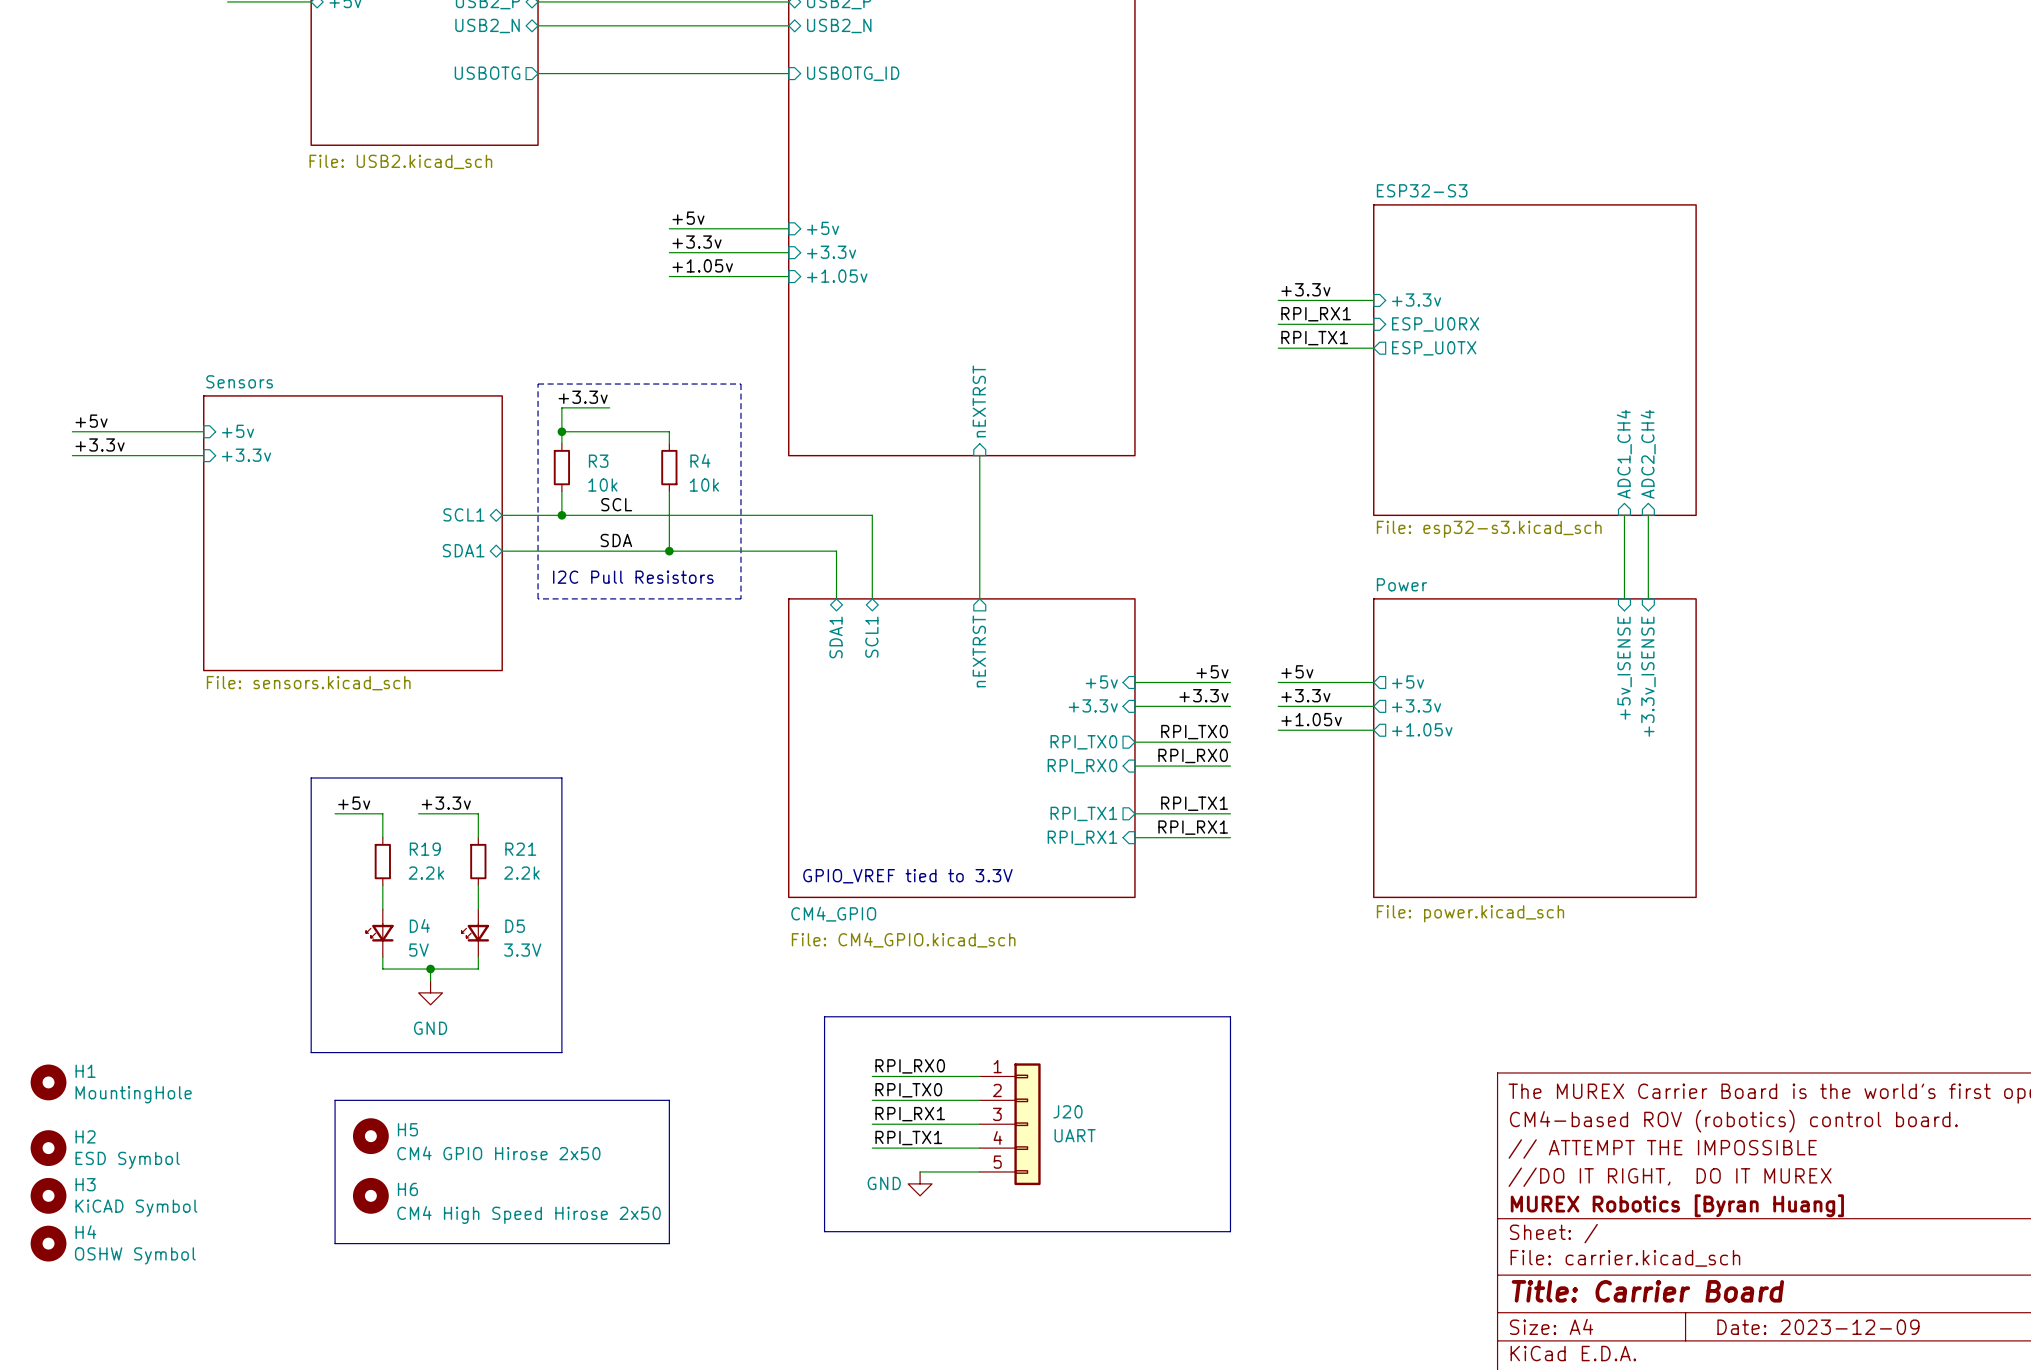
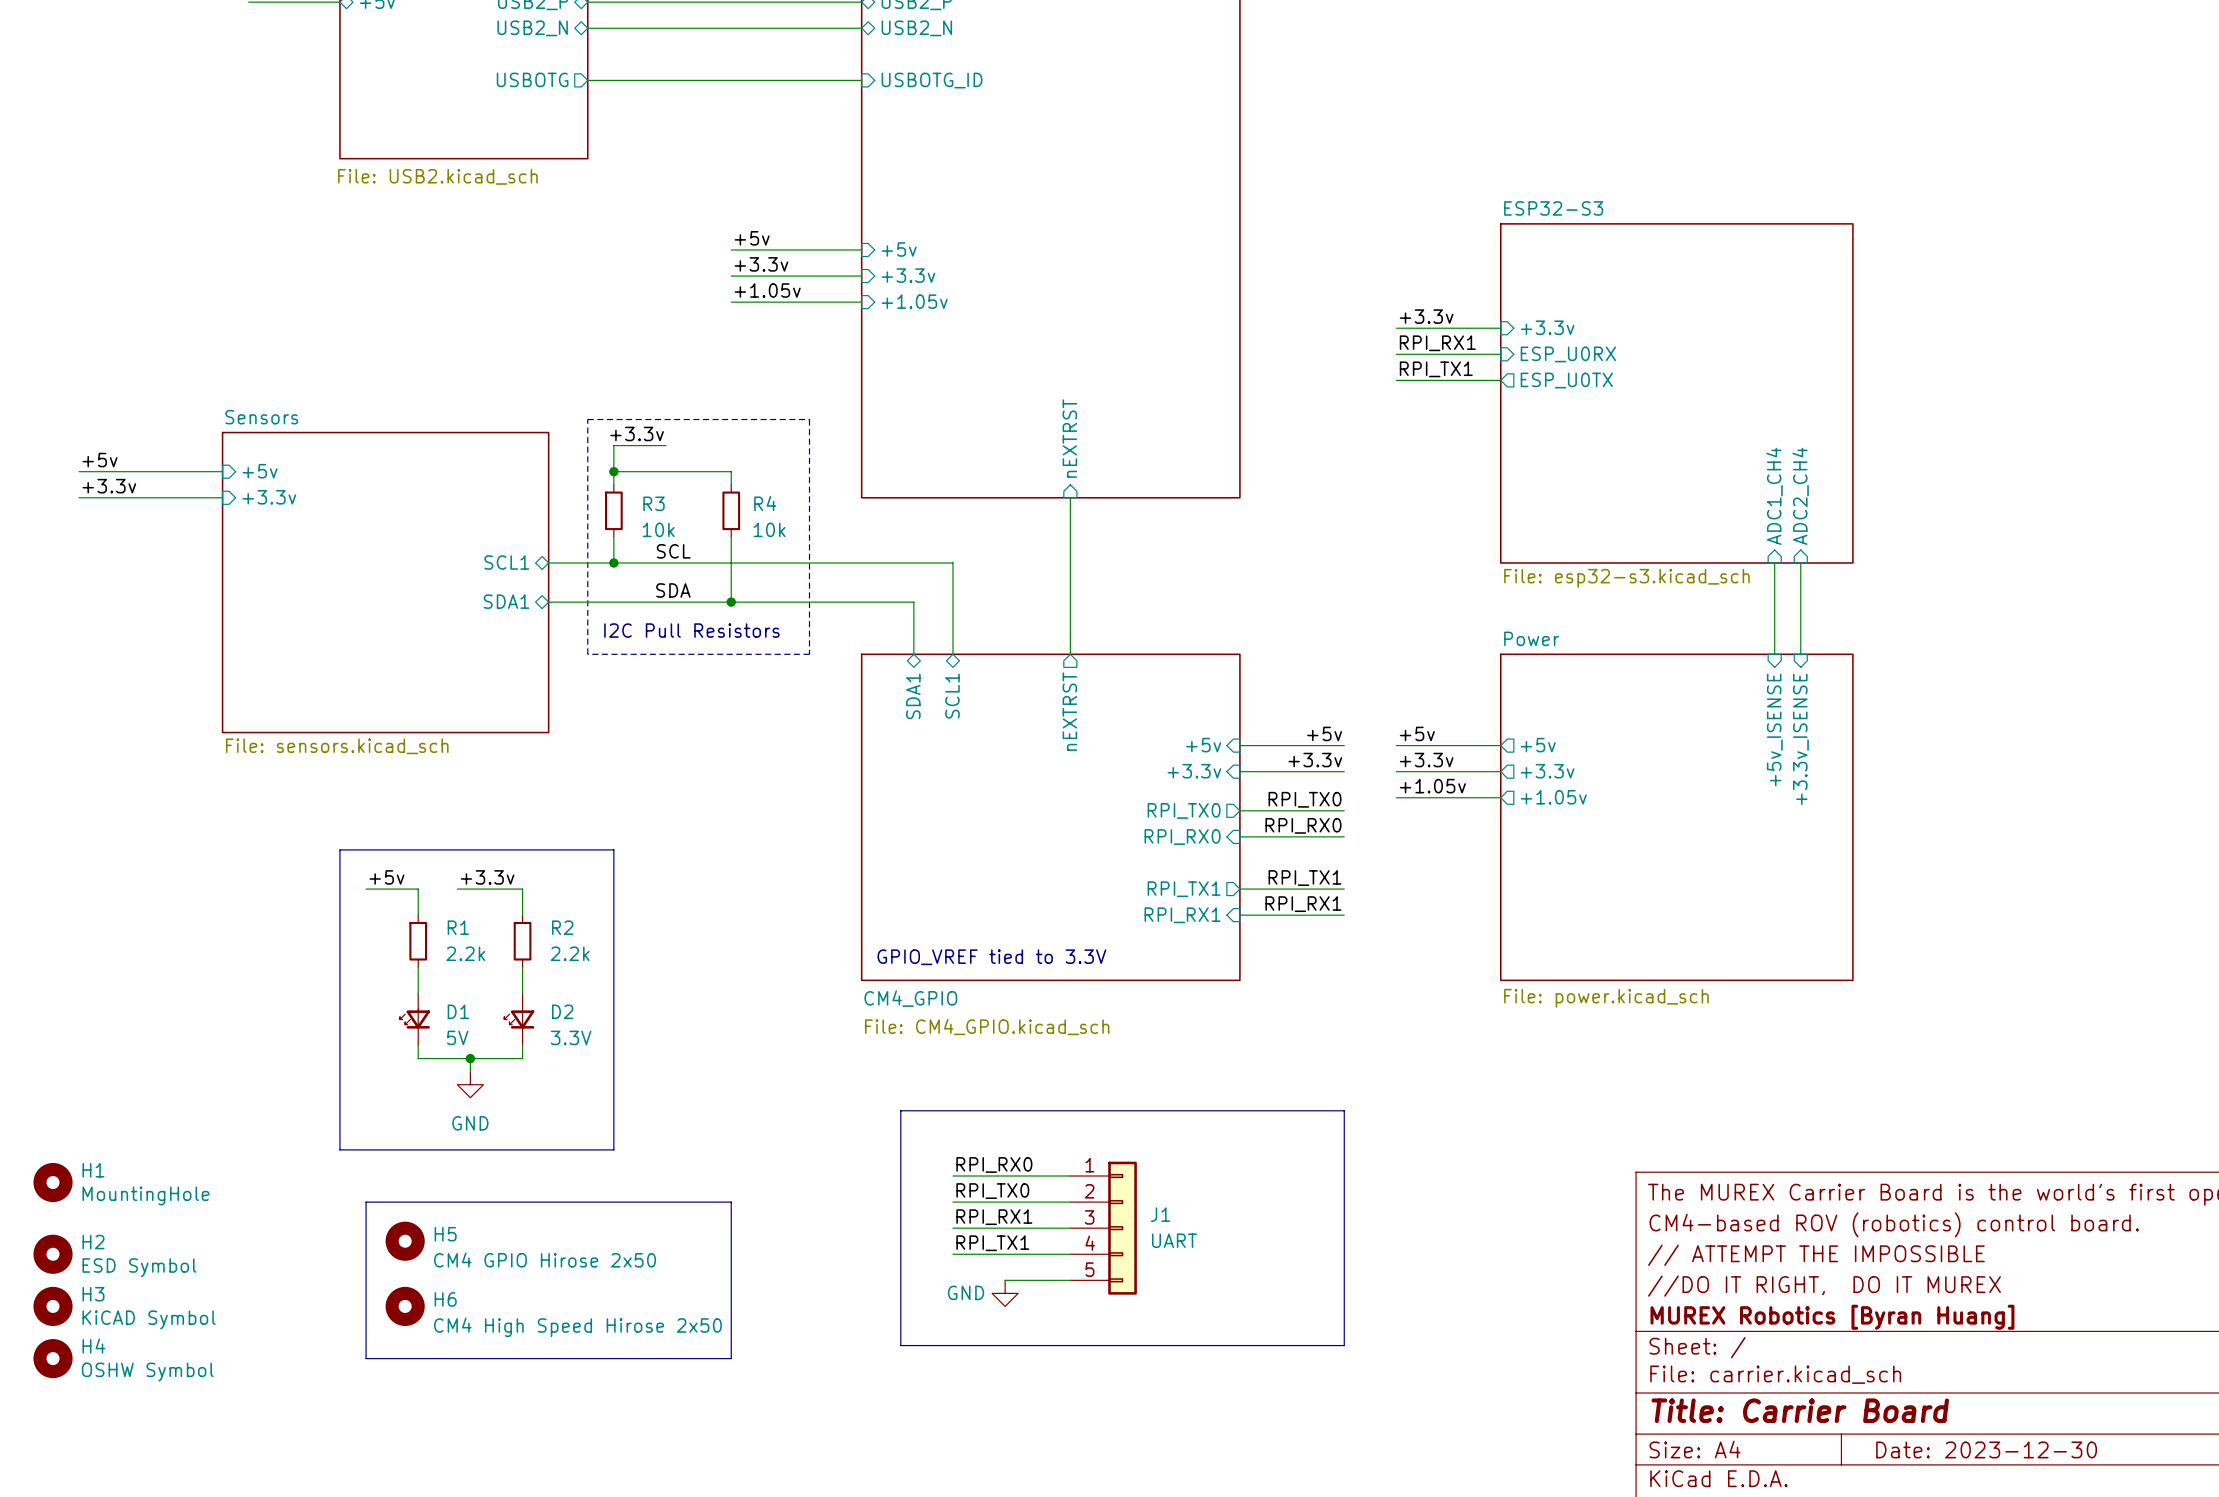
R19 name: R19 (425, 849) -> R1 (458, 927)
R21 name: R21 (520, 849) -> R2 (562, 927)
D4 name: D4 (419, 925) -> D1 (458, 1011)
D5 name: D5 (515, 926) -> D2 (562, 1011)
J20 name: J20 (1067, 1111) -> J1 (1160, 1214)
title block: Date: 2023-12-09 (1818, 1327) -> Date: 2023-12-30 (1986, 1449)

